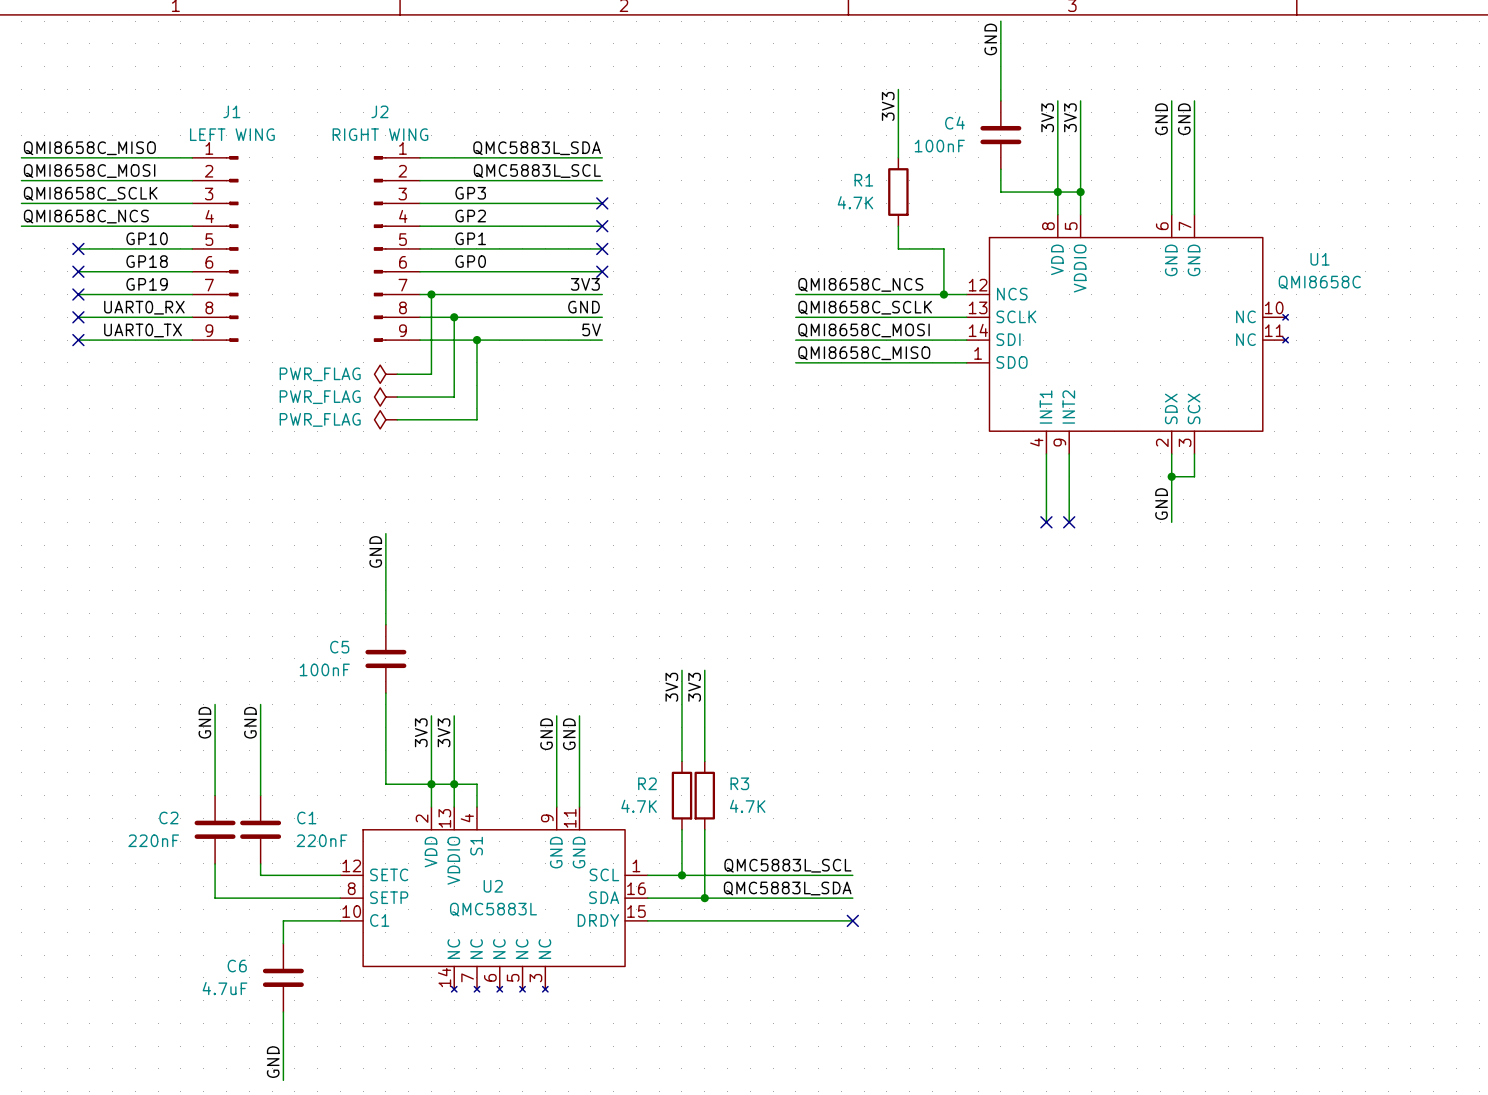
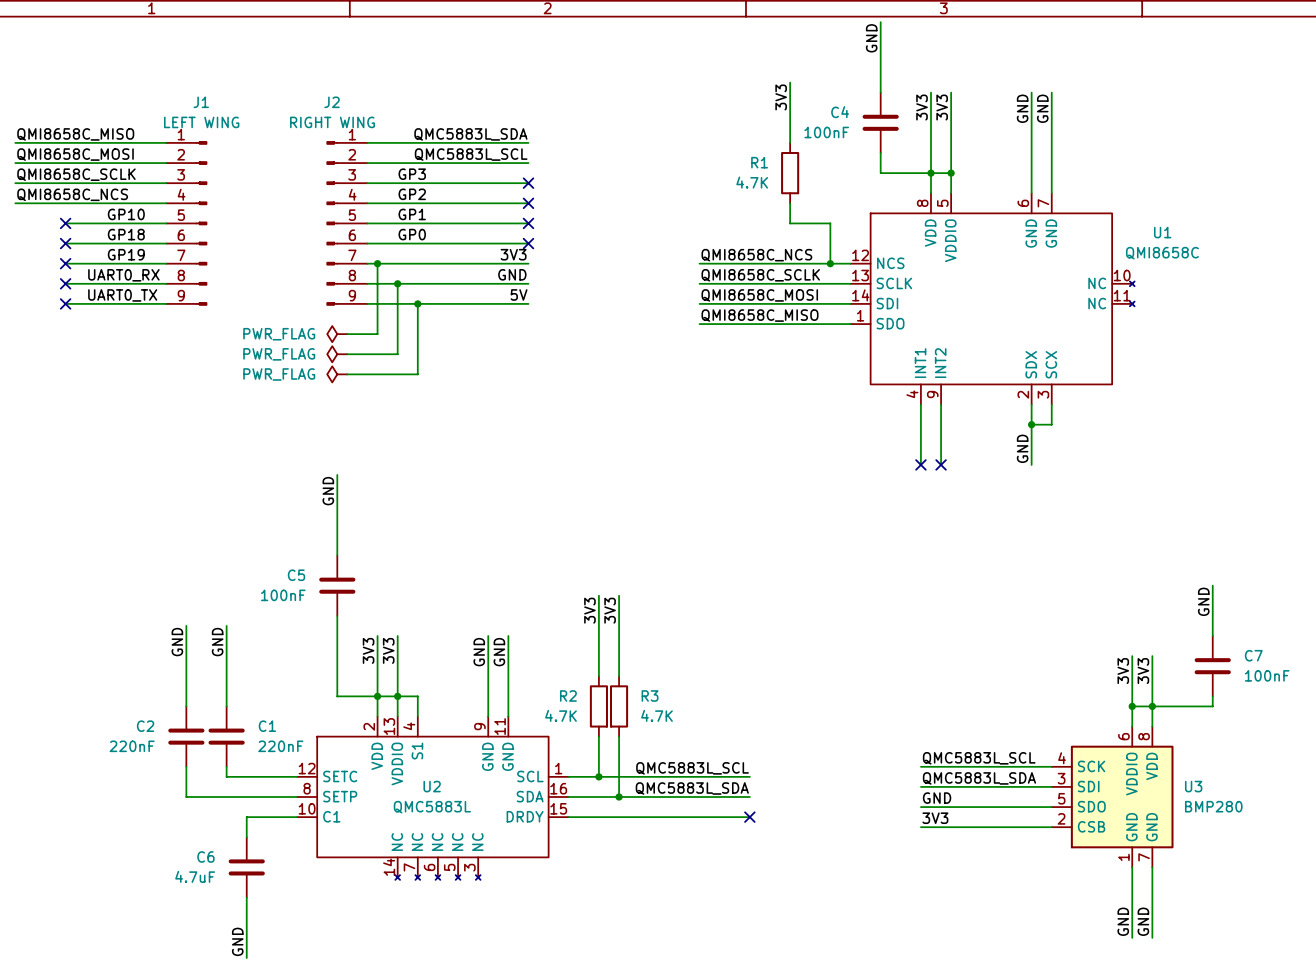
wire: none -> (1212, 585) (1212, 636)
label: none -> GND (1203, 601)
wire: none -> (1132, 656) (1132, 726)
wire: none -> (1152, 656) (1152, 726)
C7: none -> 100nF (1212, 666)
label: none -> 3V3 (1123, 671)
label: none -> 3V3 (1143, 671)
wire: none -> (1212, 696) (1212, 706) (1132, 706)
junction: none -> (1132, 706)
junction: none -> (1152, 706)
label: none -> QMC5883L_SCL (979, 758)
wire: none -> (920, 766) (1051, 766)
label: none -> QMC5883L_SDA (979, 778)
wire: none -> (920, 786) (1051, 786)
U3: none -> BMP280 (1112, 797)
label: none -> GND (937, 798)
wire: none -> (920, 807) (1051, 807)
label: none -> 3V3 (935, 818)
wire: none -> (920, 827) (1051, 827)
wire: none -> (1132, 867) (1132, 937)
wire: none -> (1152, 867) (1152, 937)
label: none -> GND (1123, 921)
label: none -> GND (1143, 921)

